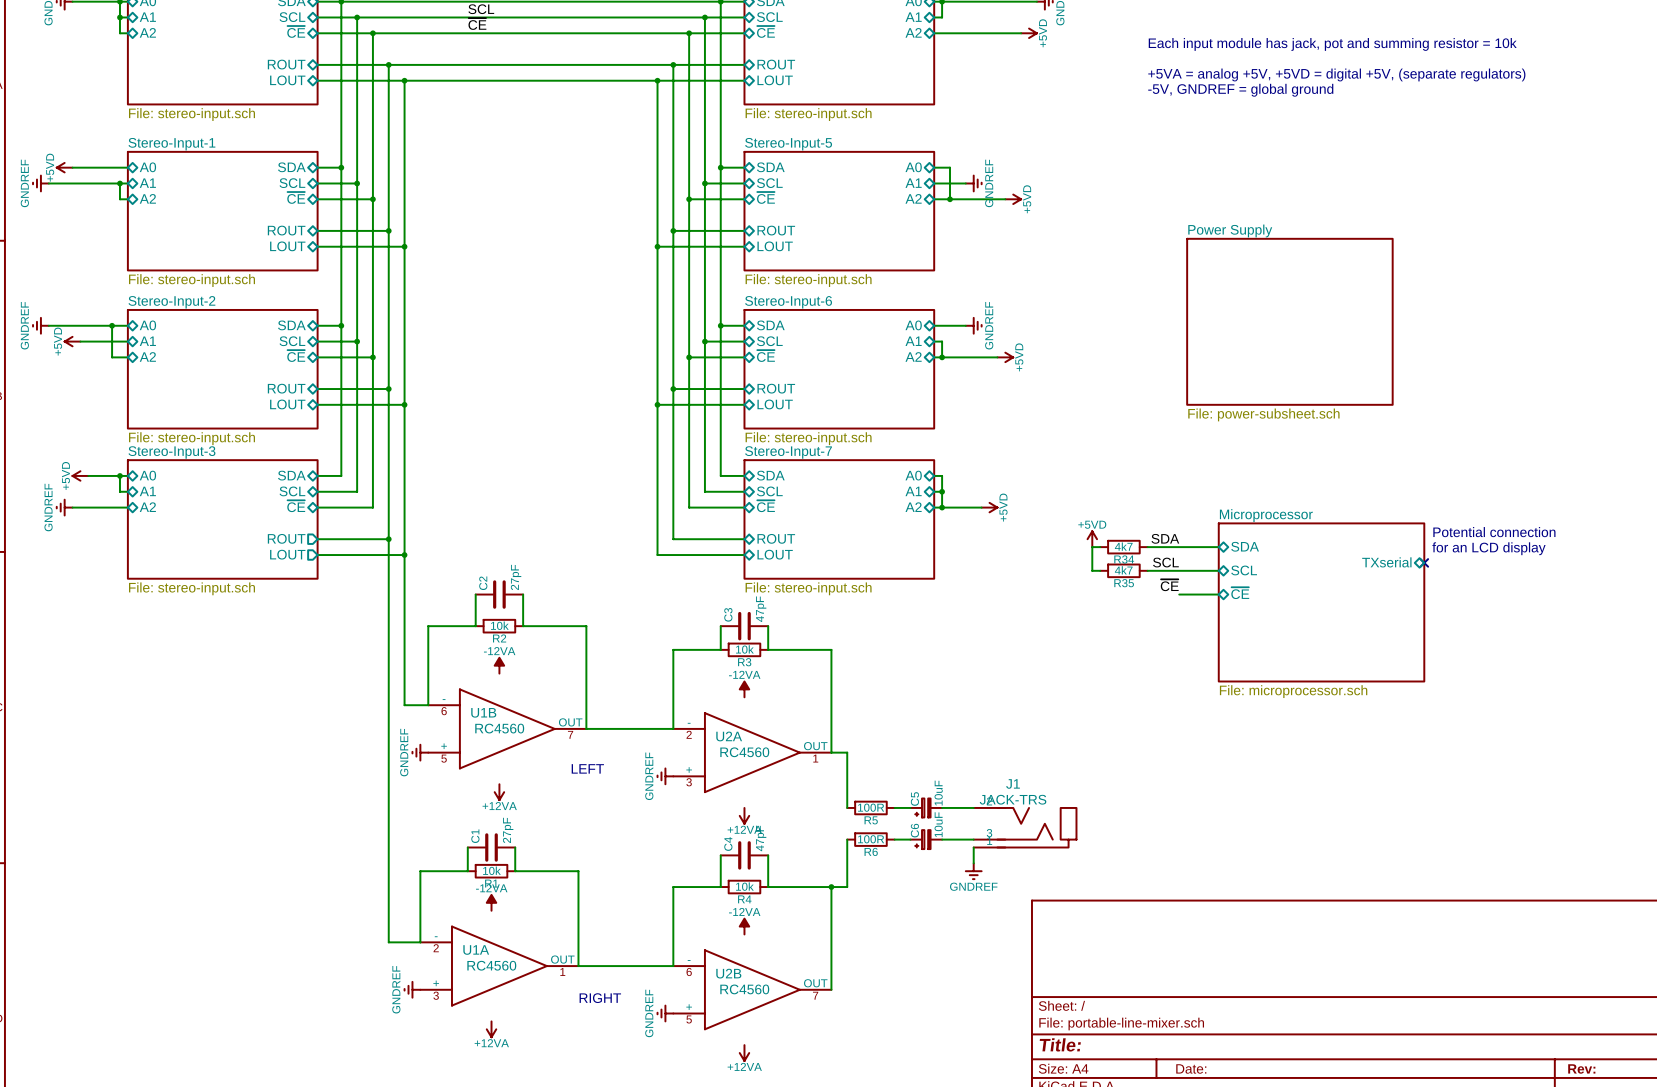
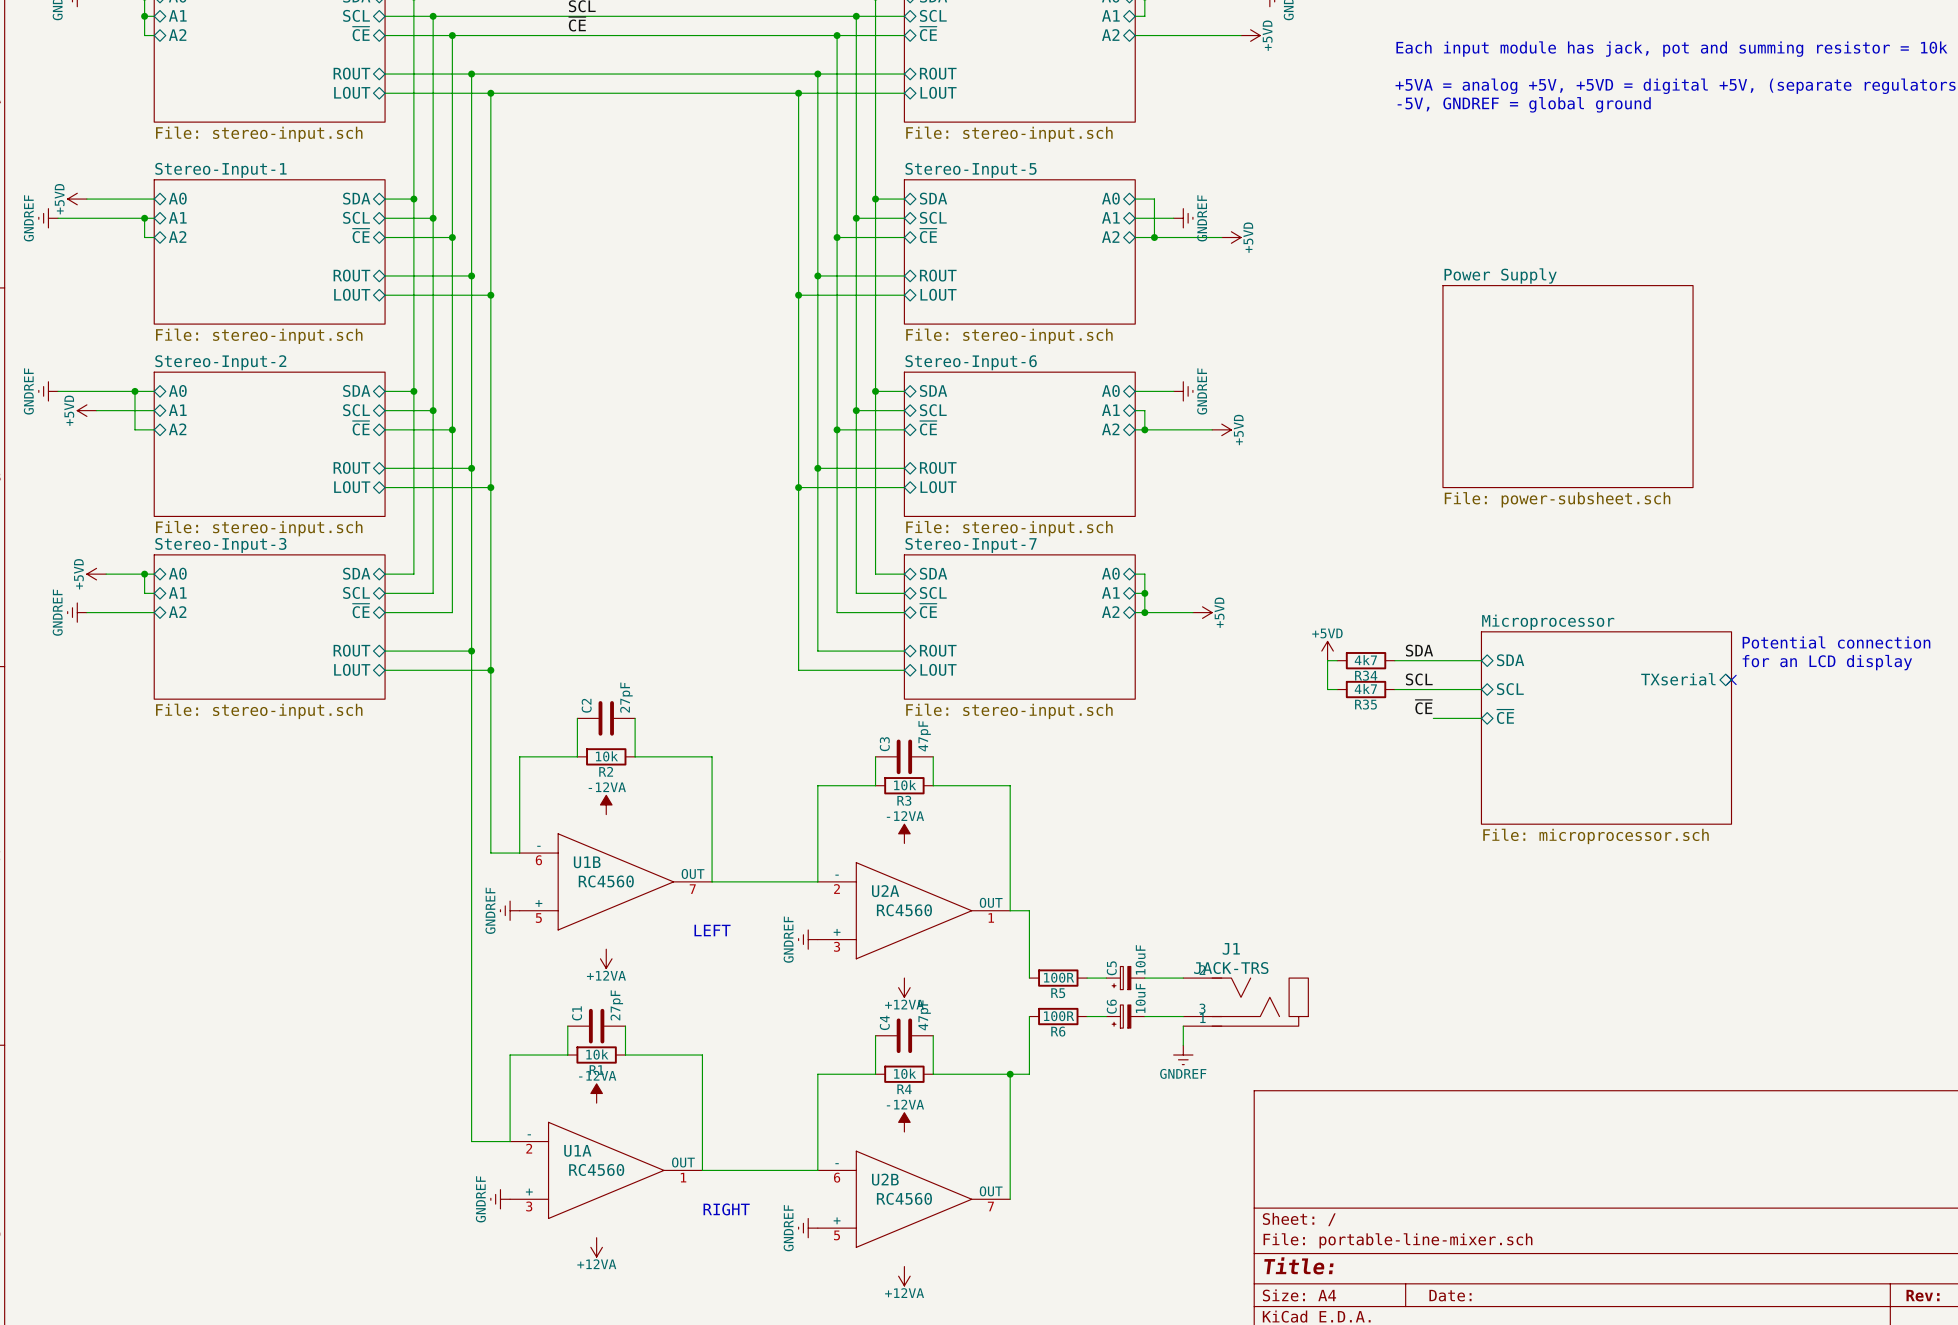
sheet pin shape: output (286, 538) -> bidirectional (351, 650)
sheet pin shape: output (287, 554) -> bidirectional (352, 669)

